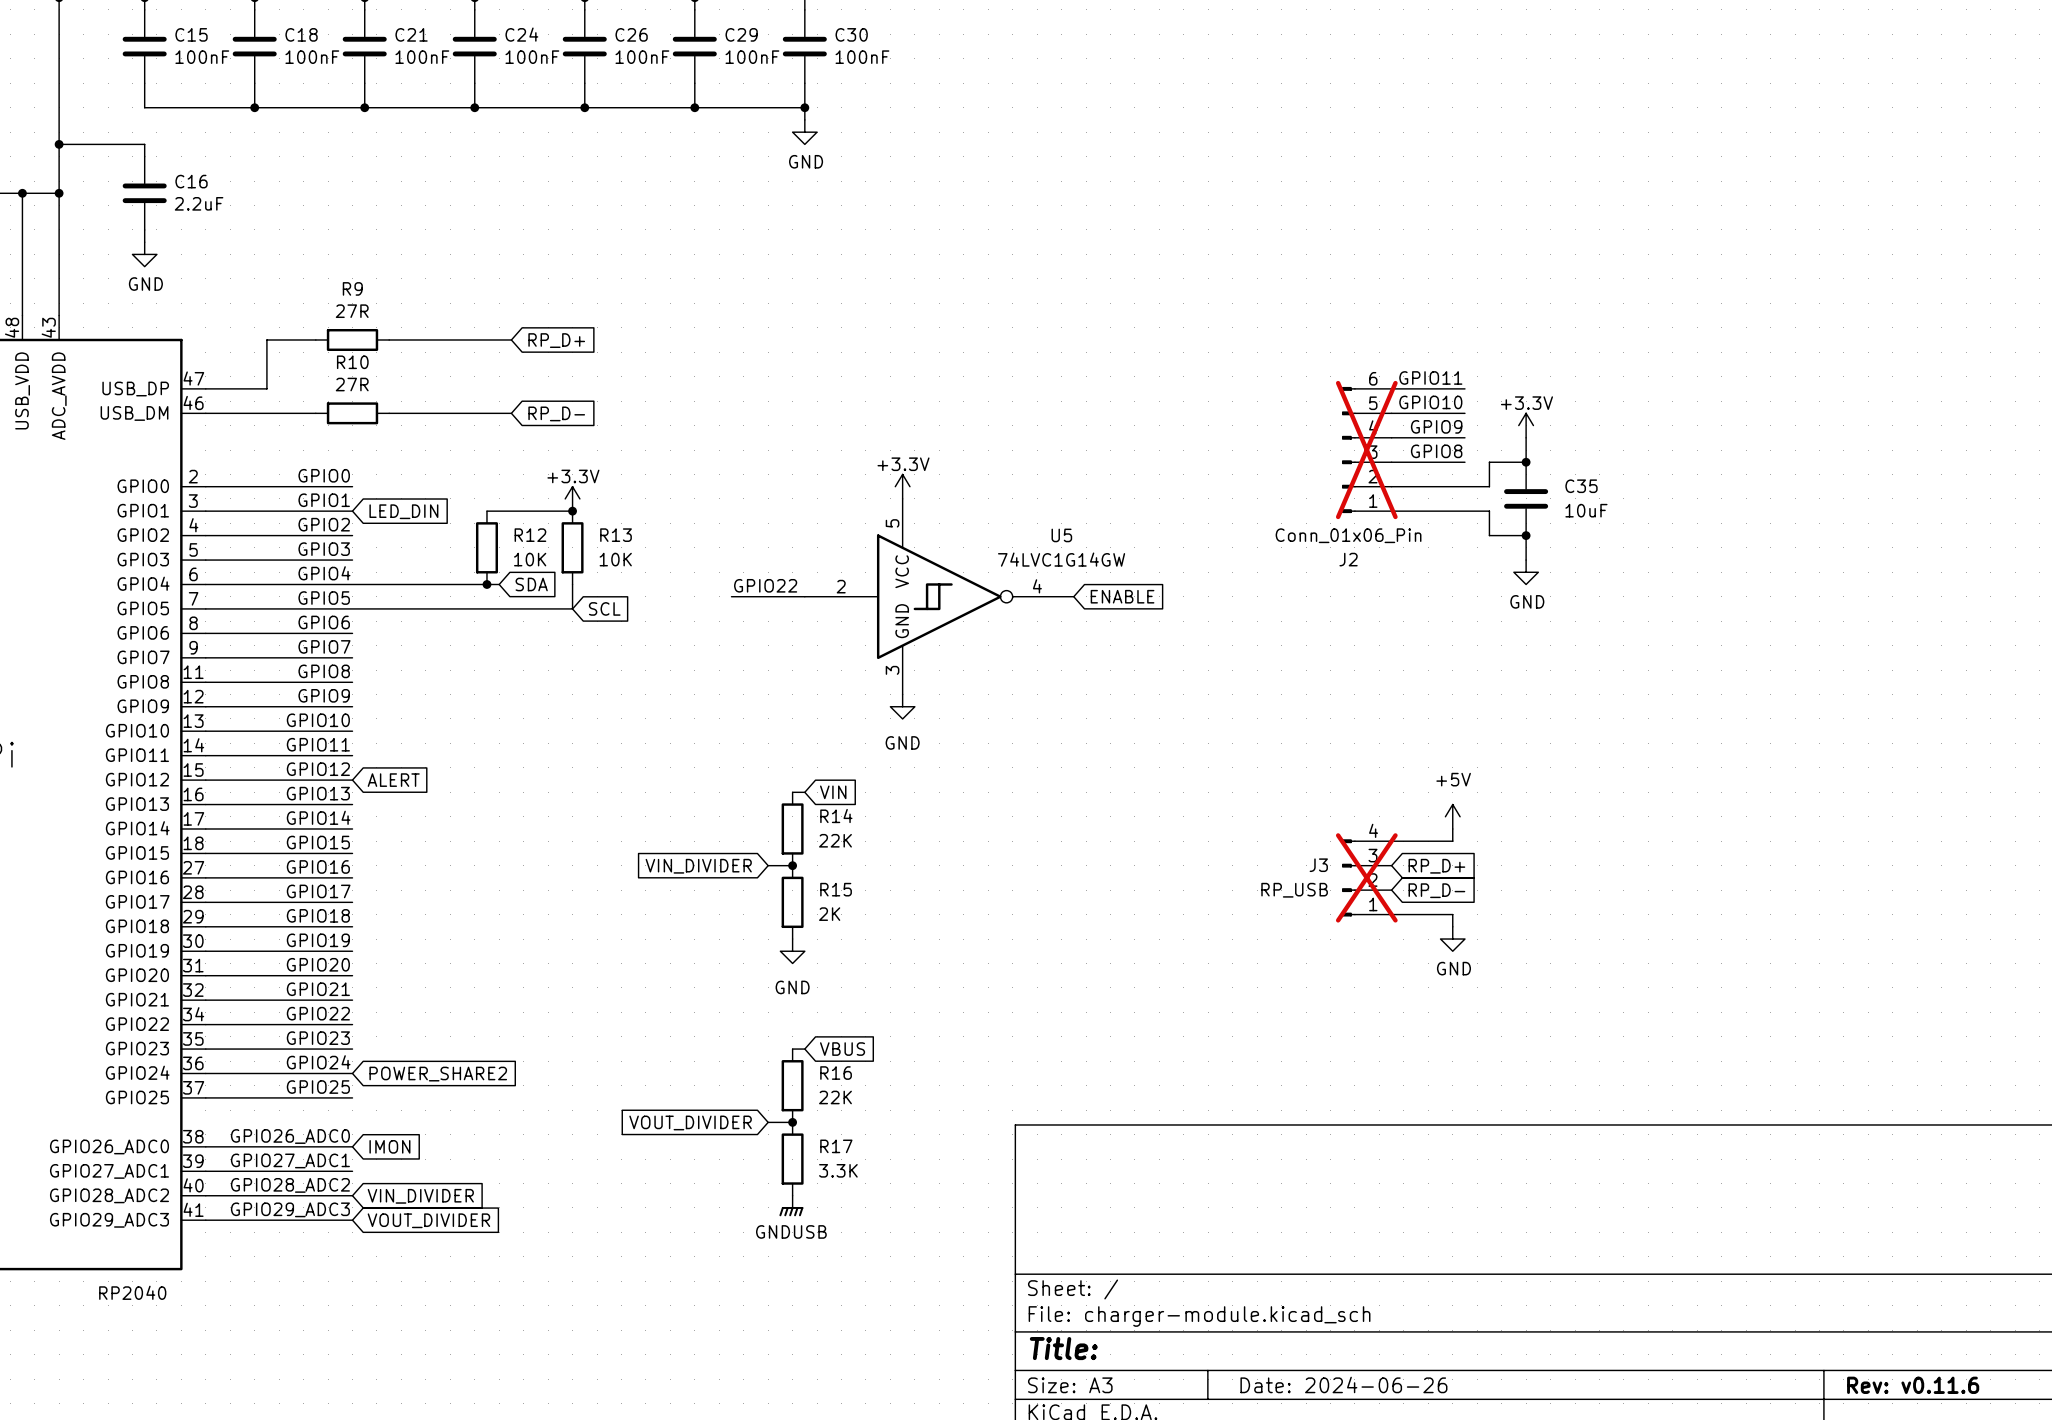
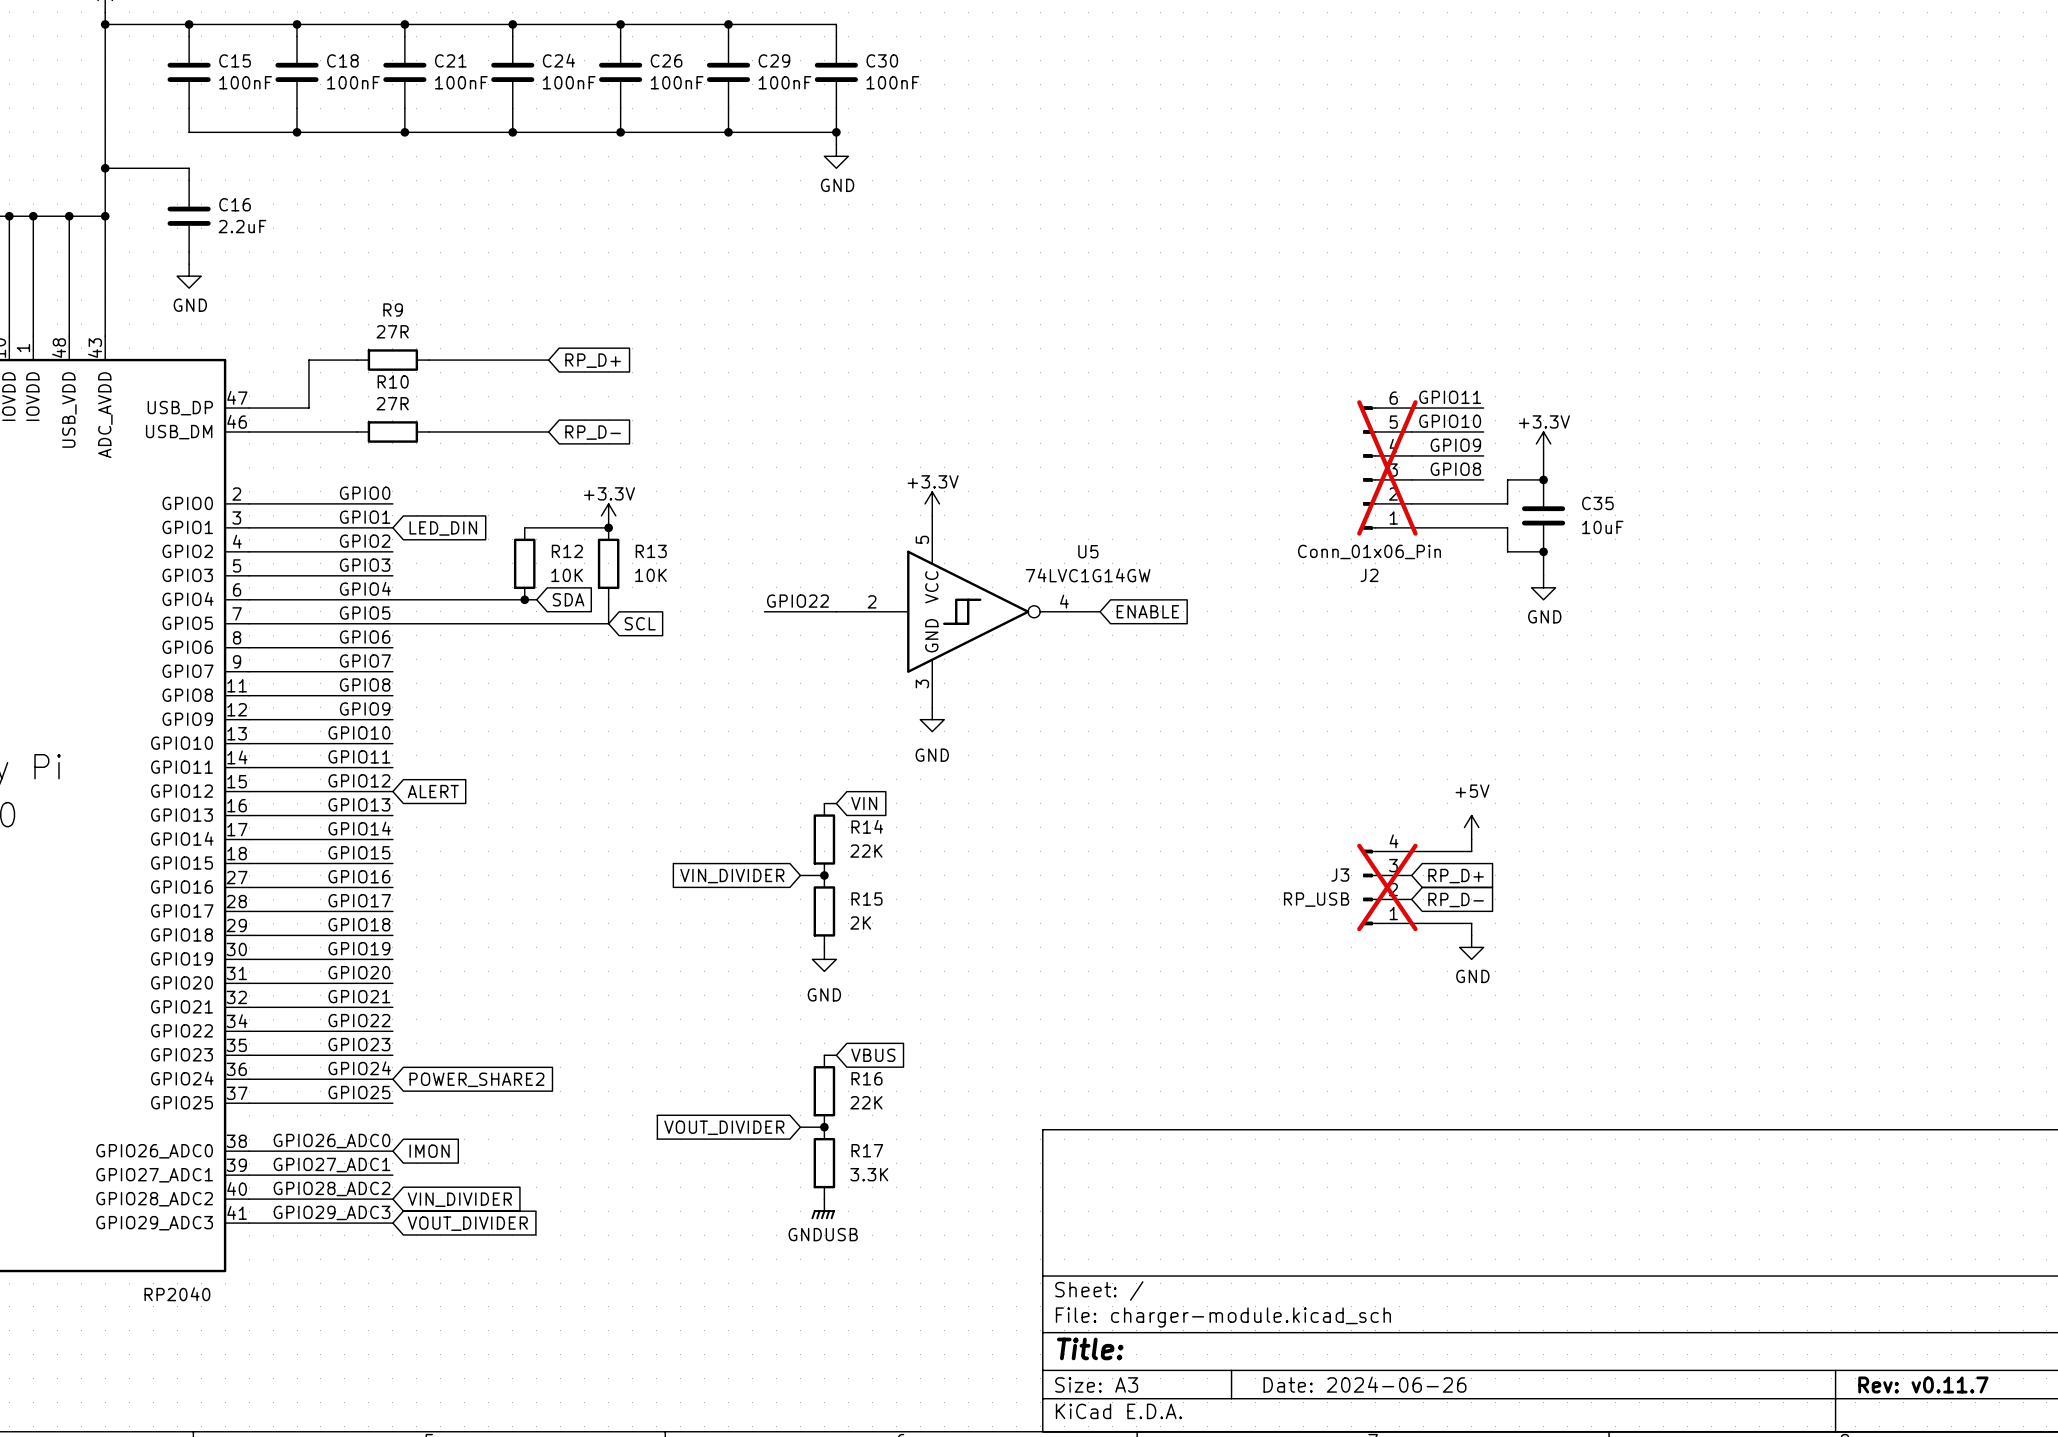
title block: Rev: v0.11.6 (1913, 1385) -> Rev: v0.11.7 (1923, 1384)

